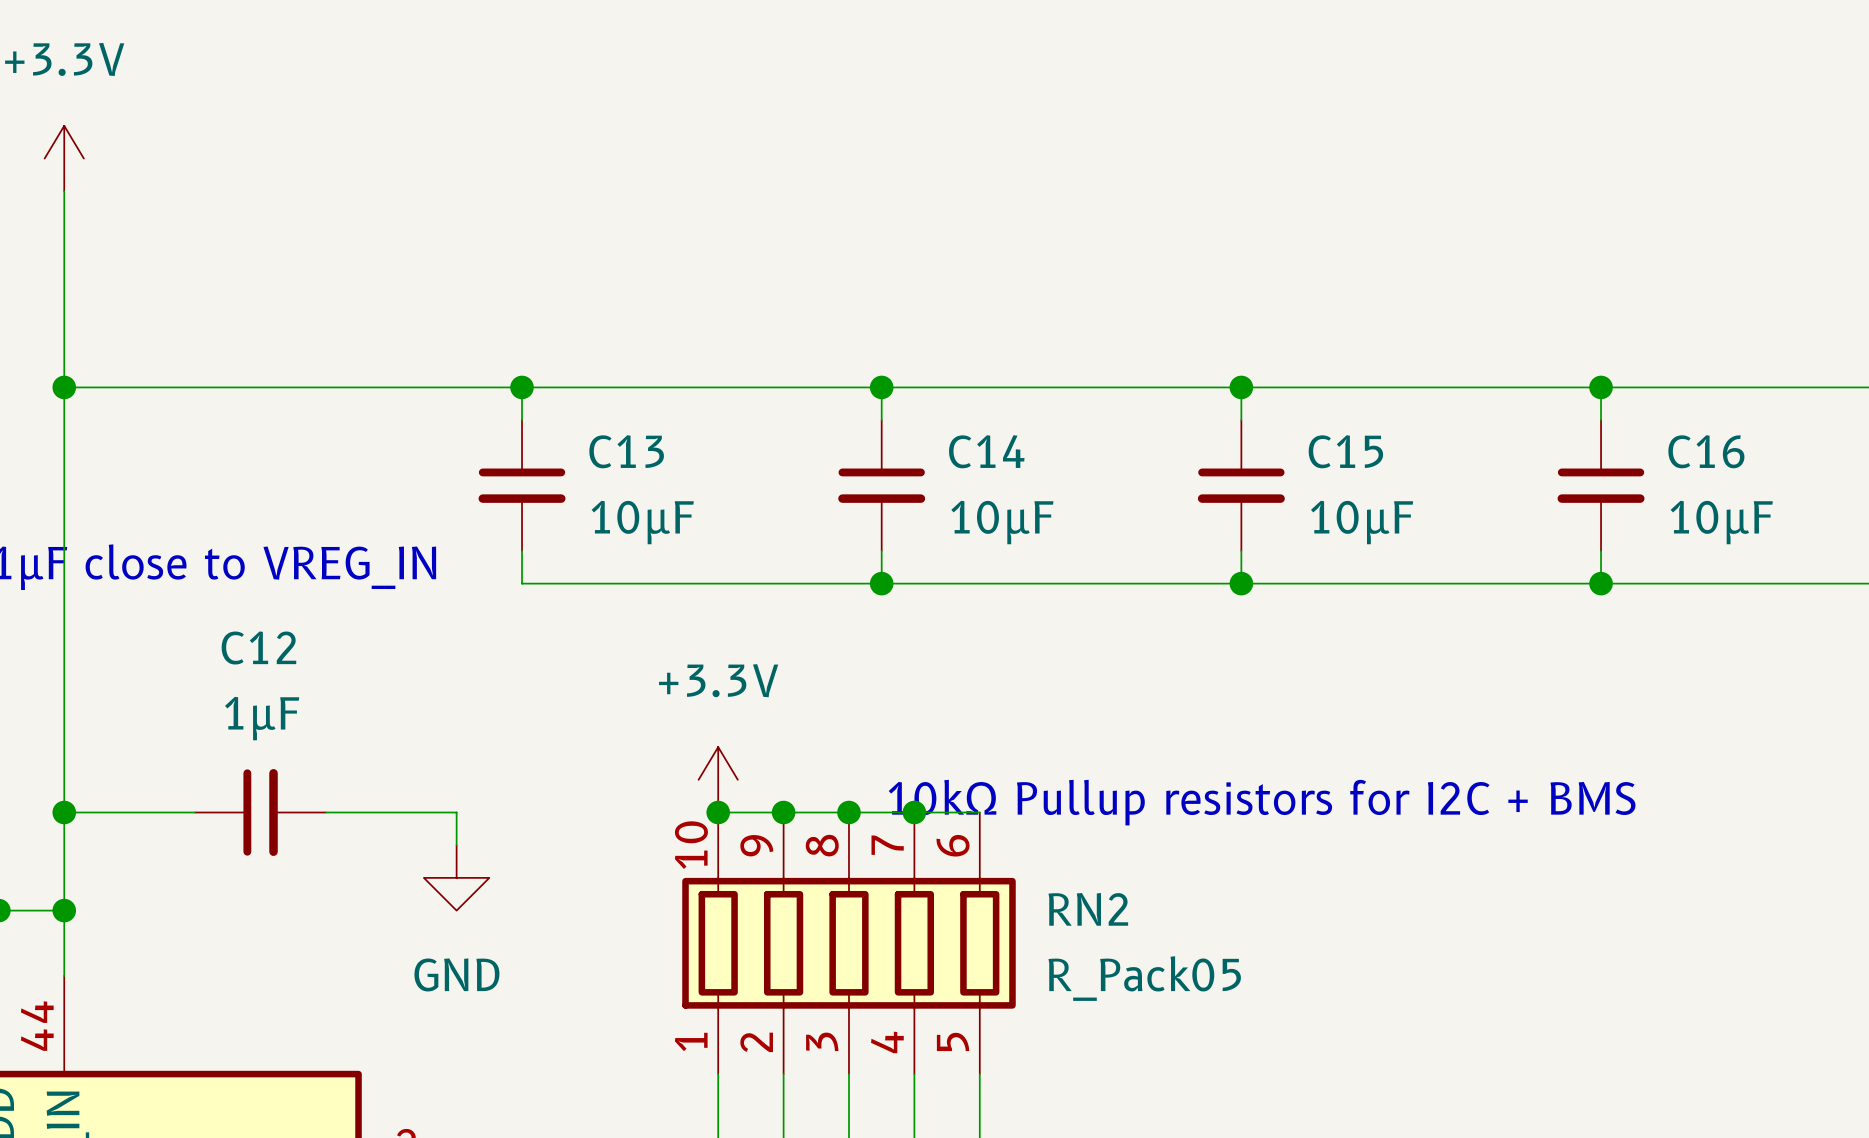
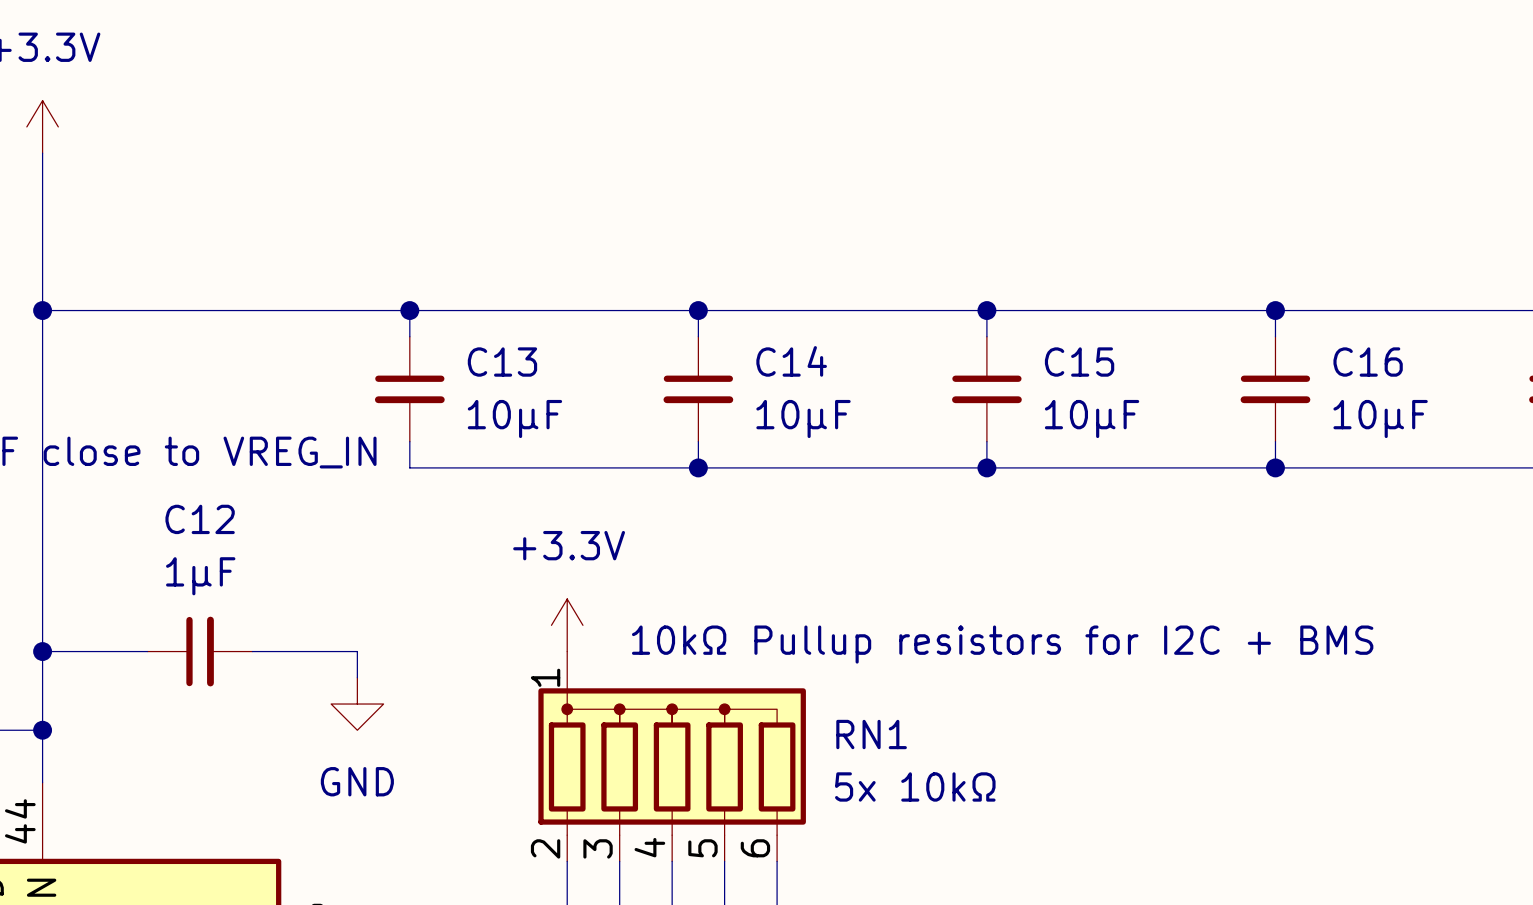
wire: (718, 812) (979, 812) -> none
junction: (718, 812) -> none
junction: (783, 812) -> none
junction: (848, 812) -> none
junction: (914, 812) -> none
RN2: R_Pack05 (848, 943) -> none
RN1: none -> 5x 10kΩ (672, 756)

